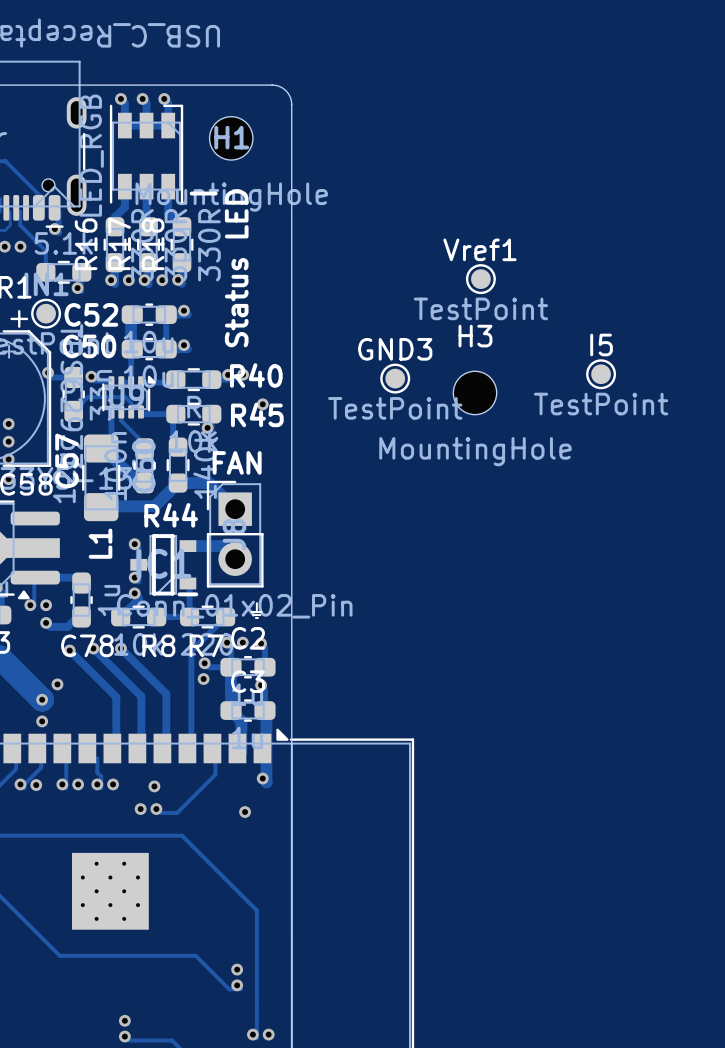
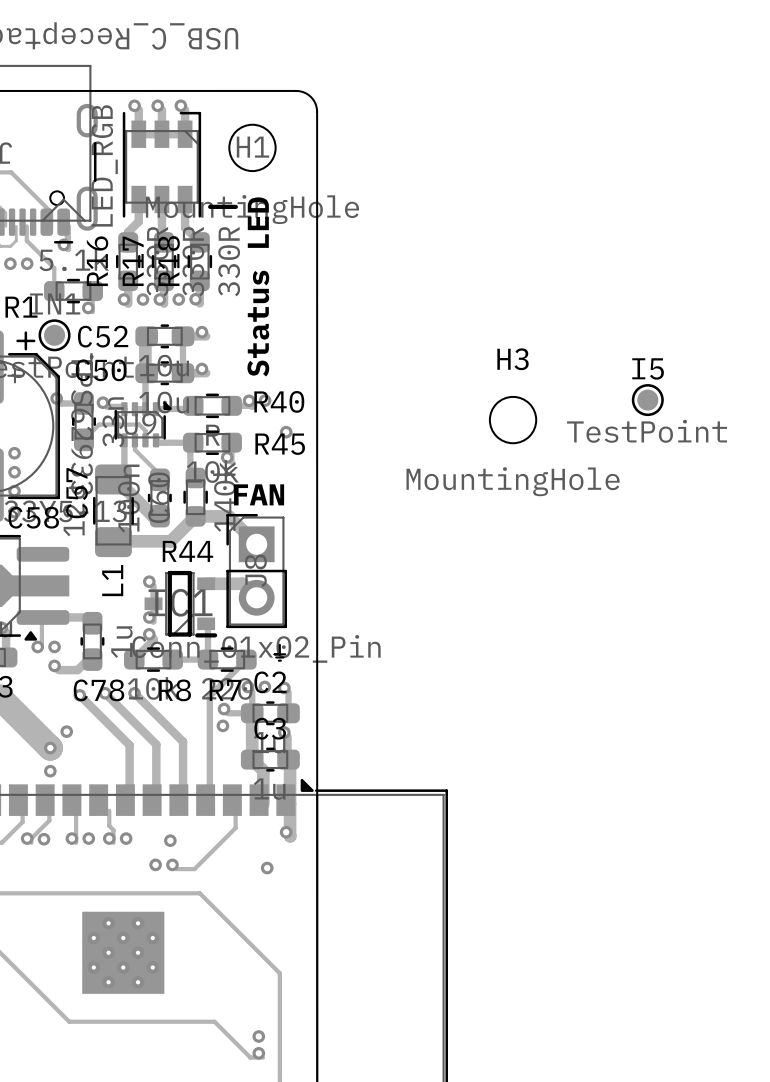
Vref1: TestPoint (480, 279) -> none
GND3: TestPoint (395, 378) -> none

